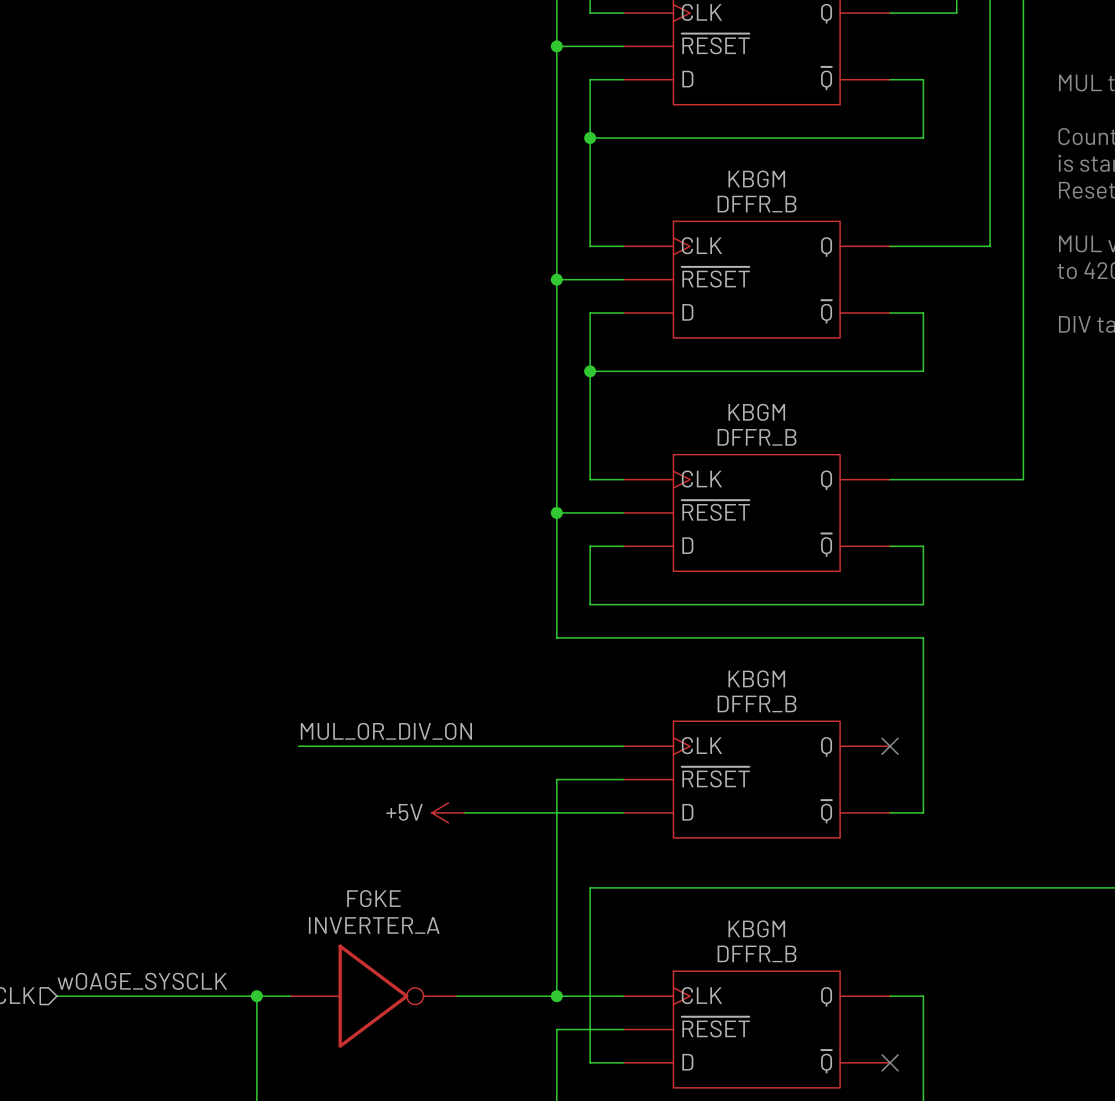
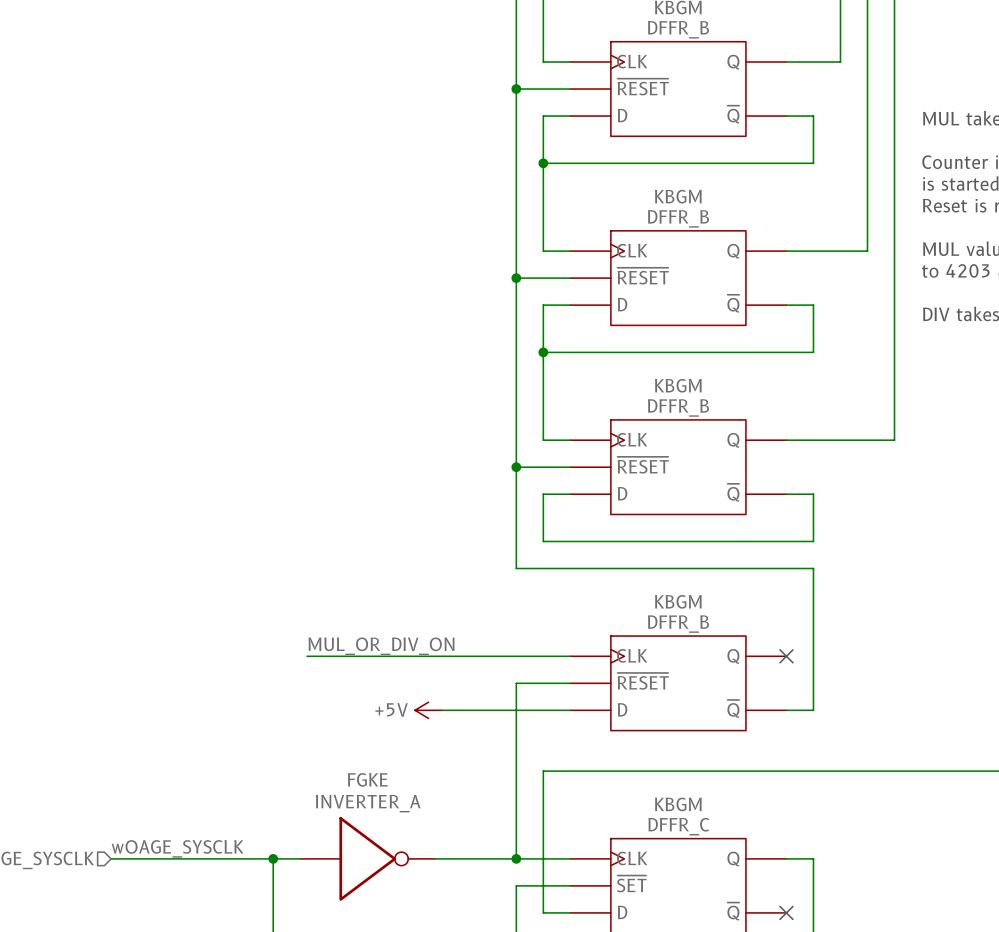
KBGM value: DFFR_B (757, 953) -> DFFR_C (678, 826)
KBGM pin name: ~{RESET} (715, 1027) -> ~{SET} (631, 883)

